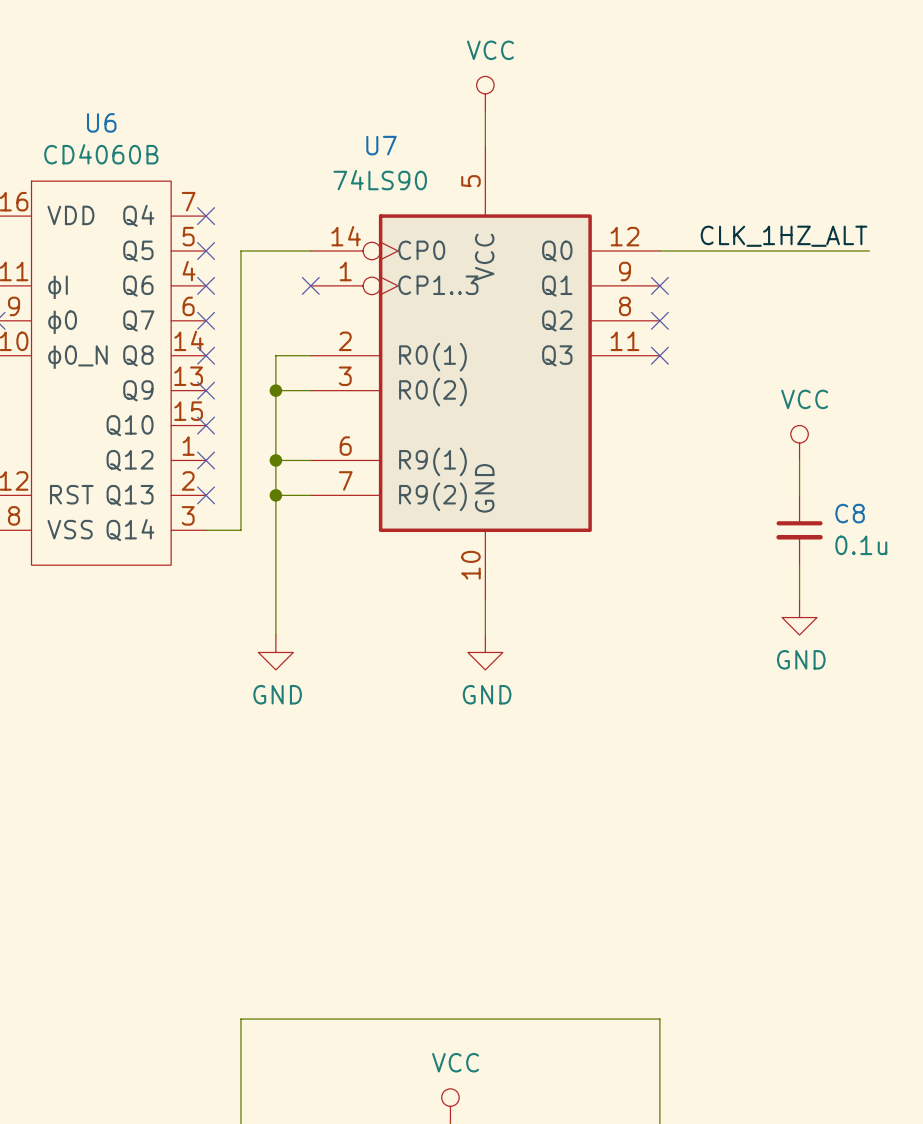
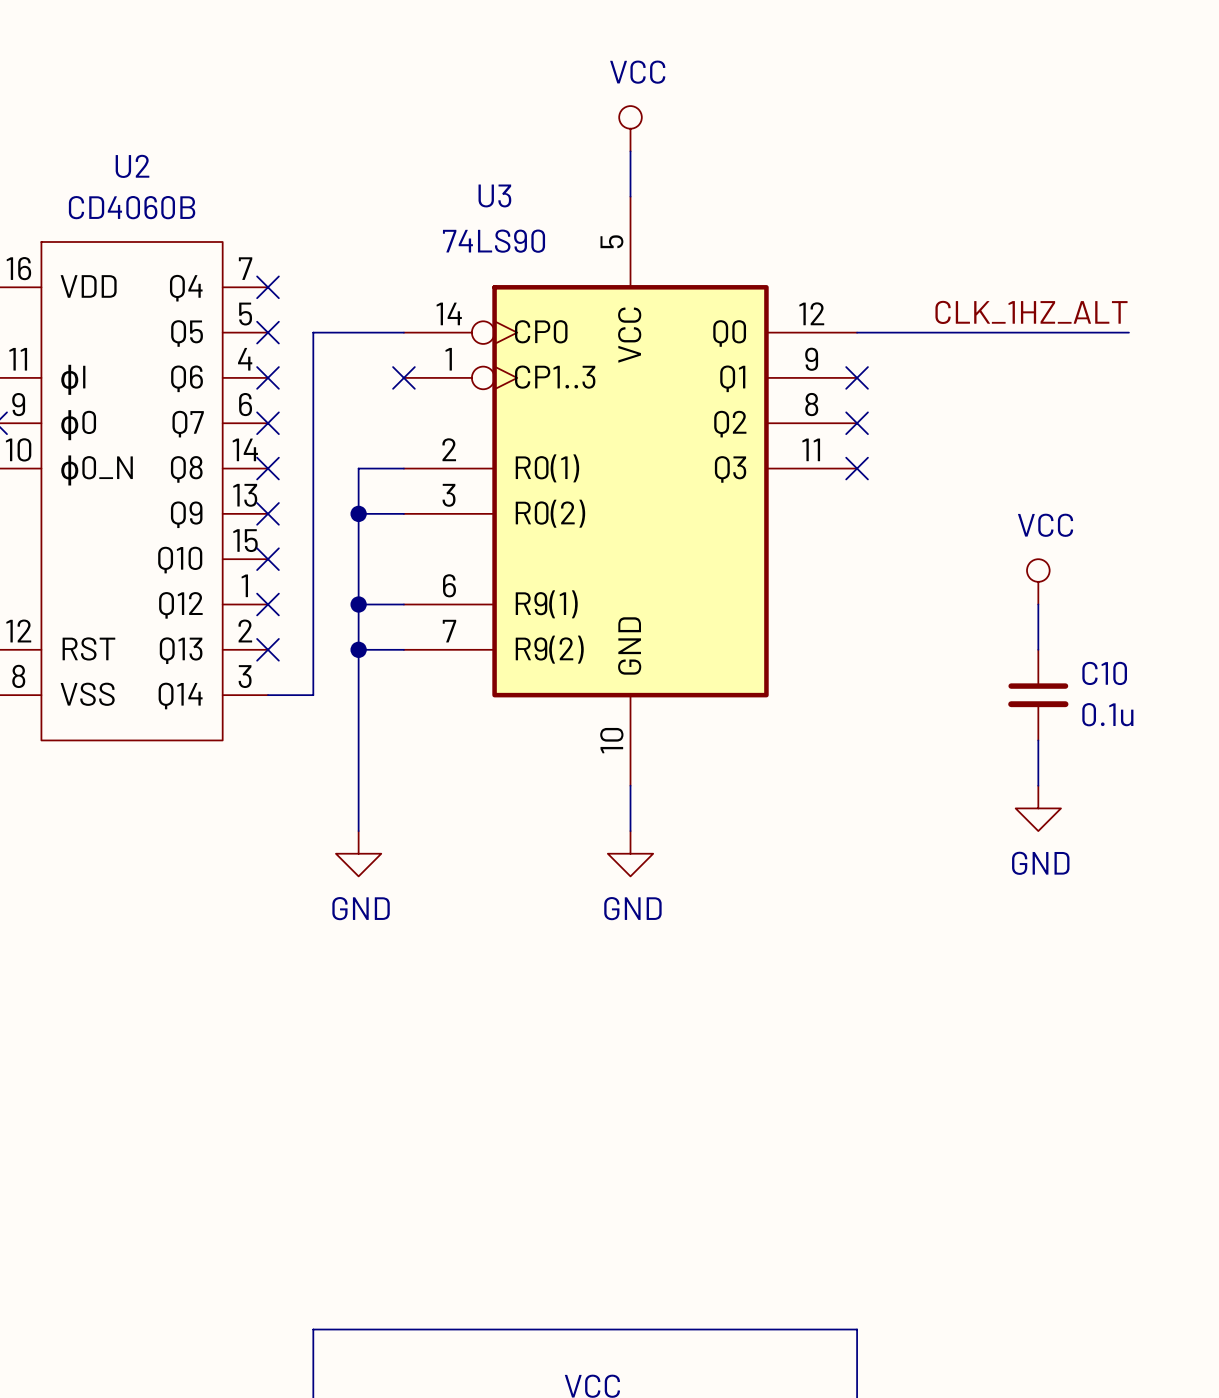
U6 name: U6 (101, 122) -> U2 (132, 166)
U7 name: U7 (381, 145) -> U3 (494, 195)
C8 name: C8 (850, 513) -> C10 (1104, 673)

